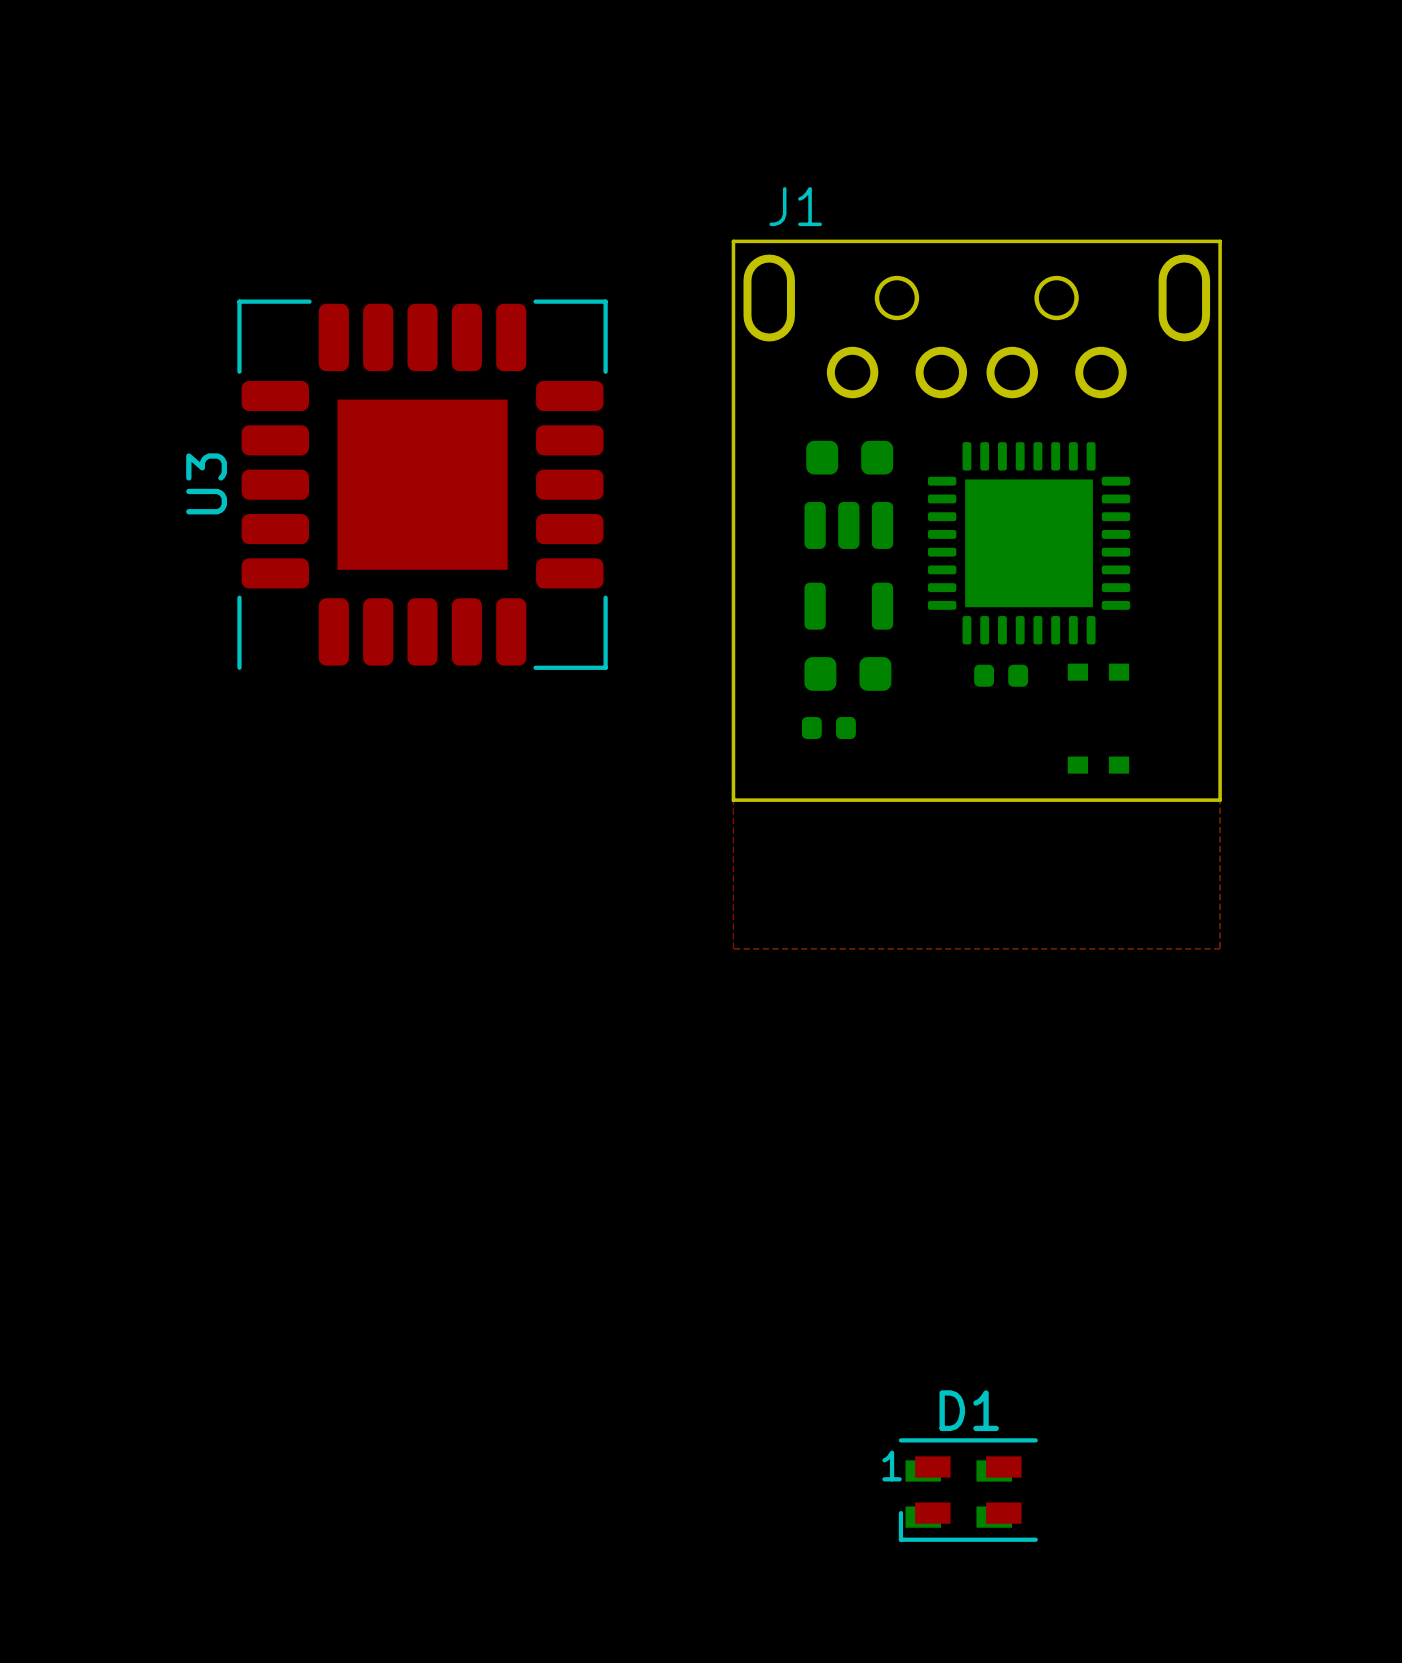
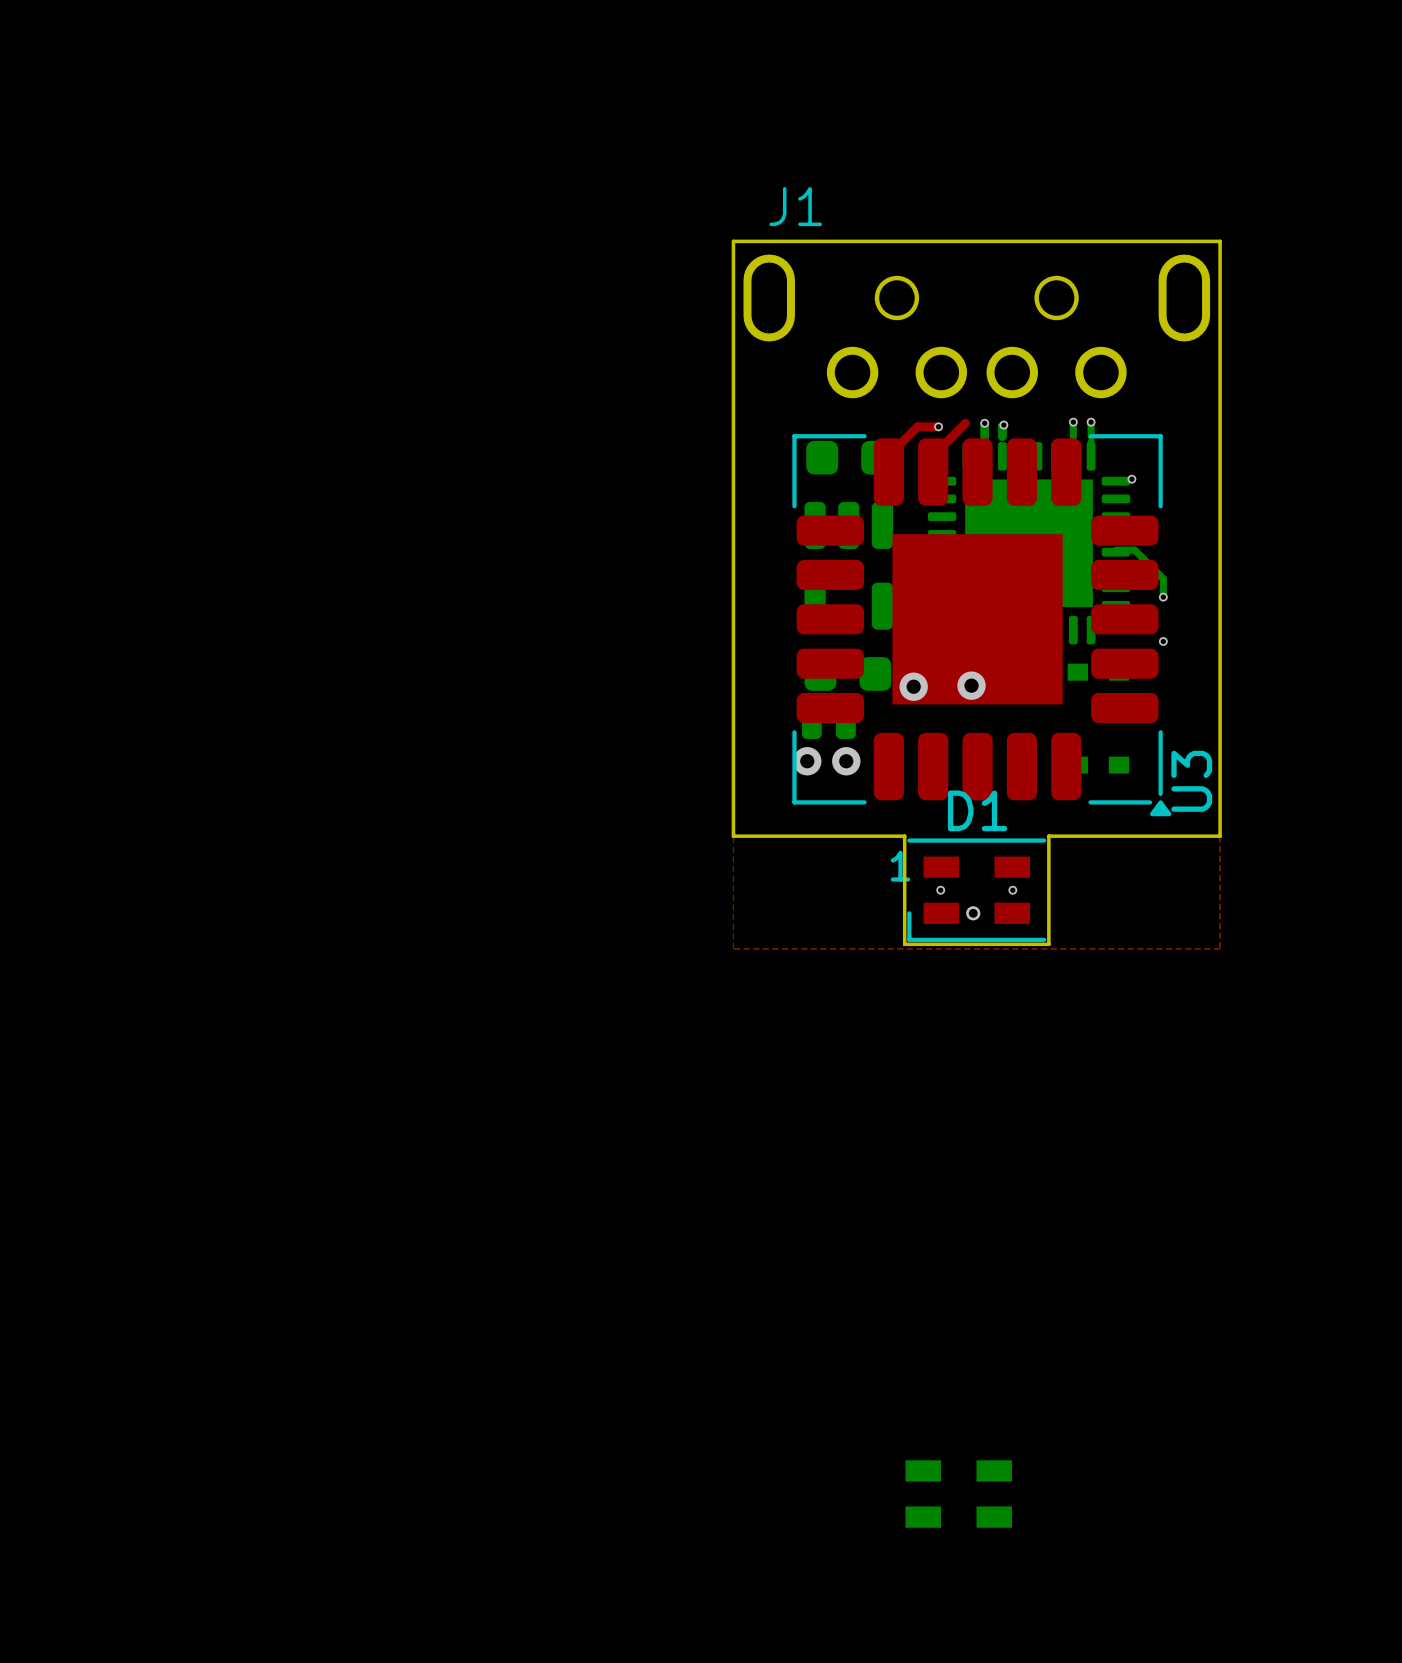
U3 footprint: [237, 299, 608, 670] -> [792, 434, 1172, 817]
bottom track: none -> (1073, 422) (1073, 436)
via: none -> (1073, 422)
bottom track: none -> (1091, 422) (1091, 436)
via: none -> (1091, 422)
top track: none -> (965, 423) (933, 455)
bottom track: none -> (984, 423) (984, 436)
via: none -> (984, 423)
bottom track: none -> (1003, 425) (1002, 436)
via: none -> (1003, 425)
top track: none -> (938, 426) (917, 426) (888, 455) (888, 472)
via: none -> (938, 426)
via: none -> (1131, 479)
U3 name position: U3 (206, 483) -> U3 (1191, 781)
bottom track: none -> (1115, 550) (1134, 550) (1163, 578) (1163, 597)
via: none -> (1163, 597)
via: none -> (1163, 641)
via: none -> (971, 685)
via: none -> (913, 686)
via: none -> (807, 761)
via: none -> (846, 761)
board edge: (733, 800) (1220, 800) -> (733, 800) (733, 836) (904, 836) (904, 944) (1048, 944) (1048, 836) (1220, 836) (1220, 800)
via: none -> (940, 890)
via: none -> (1012, 890)
via: none -> (973, 913)
D1 position: (968, 1490) -> (976, 890)

